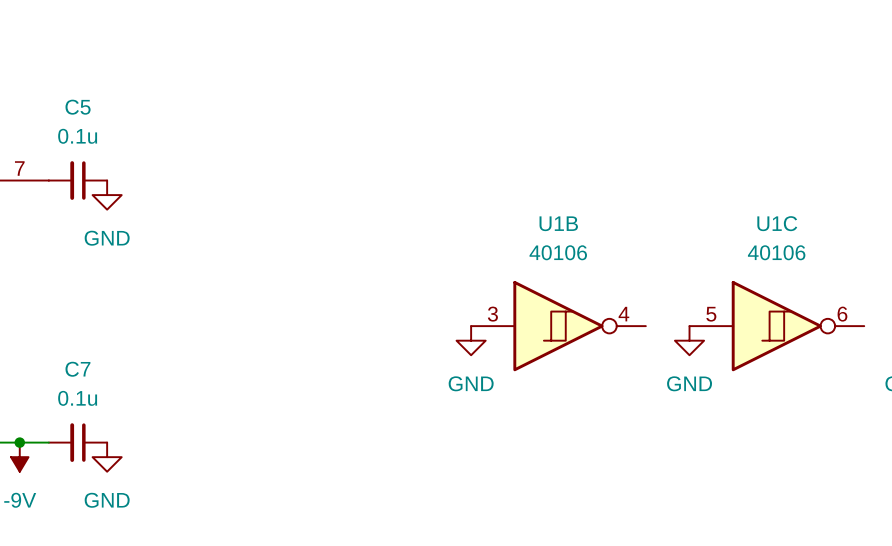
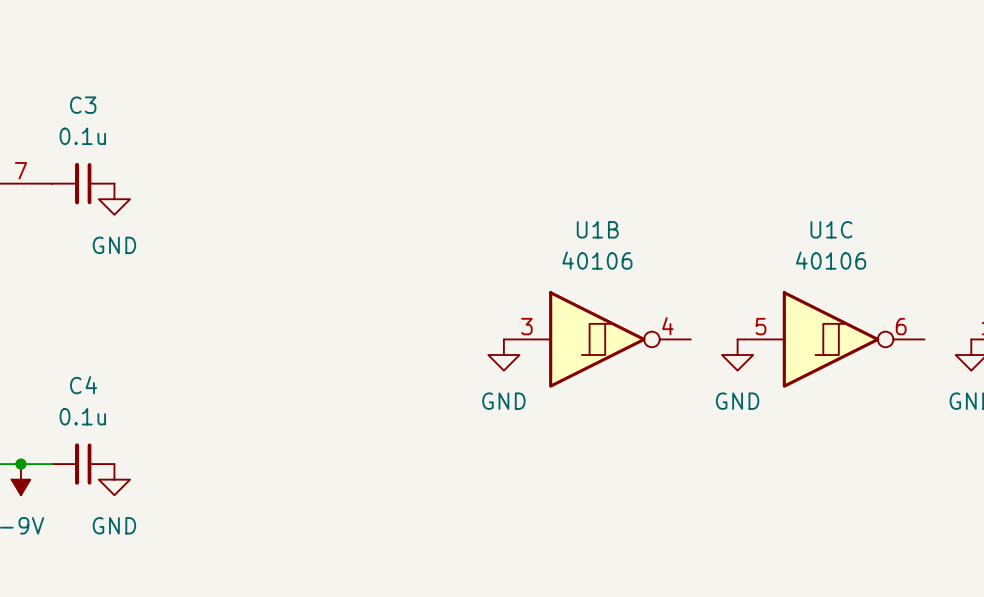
C5 name: C5 (78, 107) -> C3 (83, 105)
C7 name: C7 (77, 369) -> C4 (83, 385)

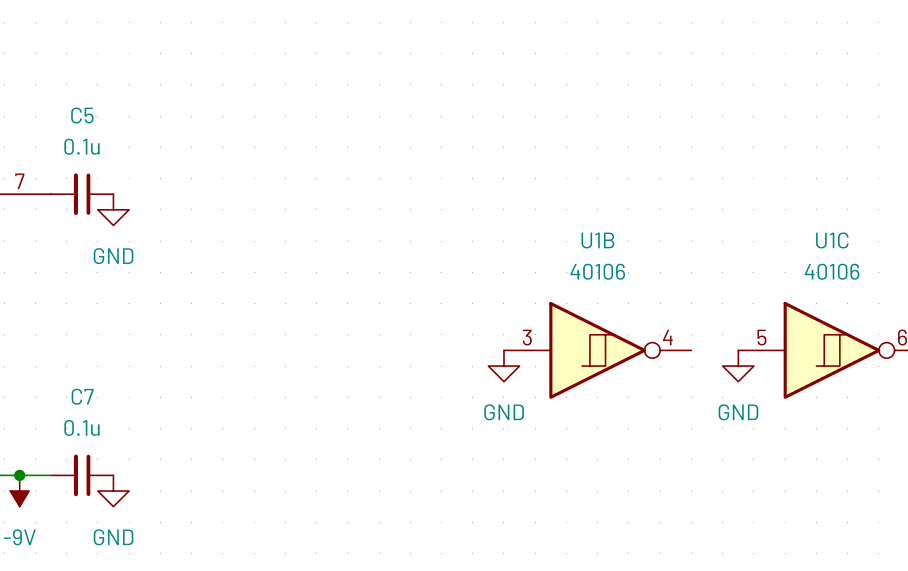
C3 name: C3 (83, 105) -> C5 (82, 115)
C4 name: C4 (83, 385) -> C7 (82, 396)

